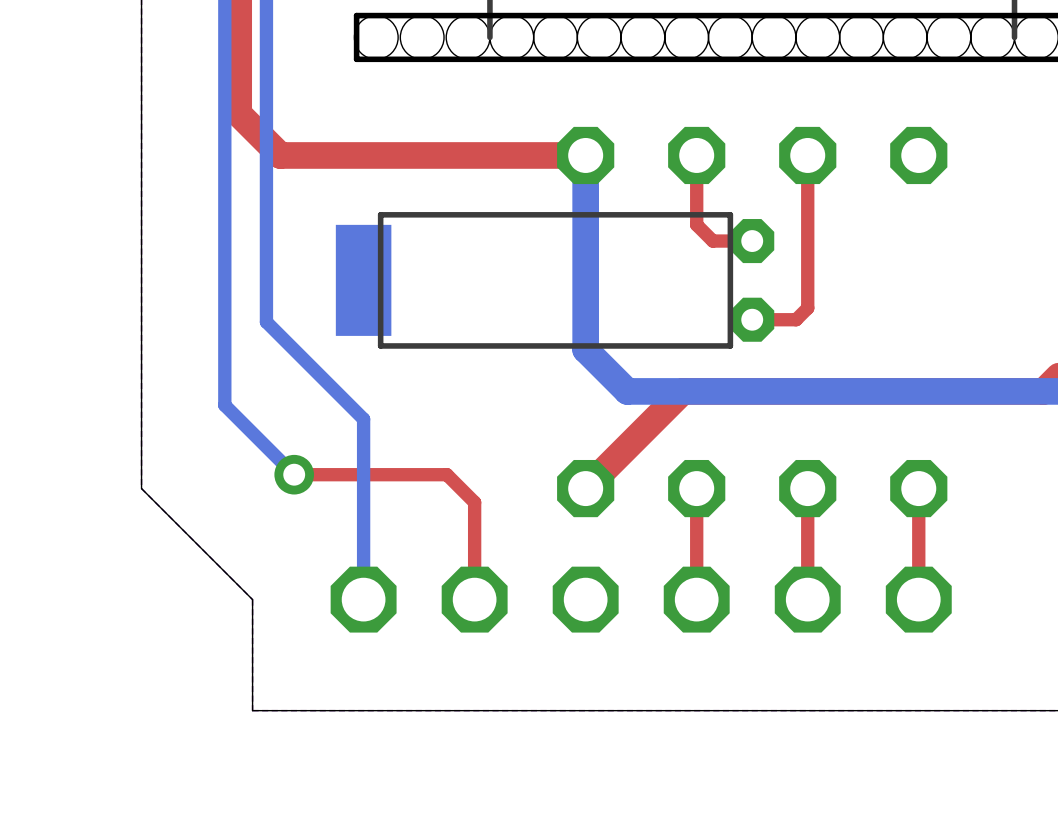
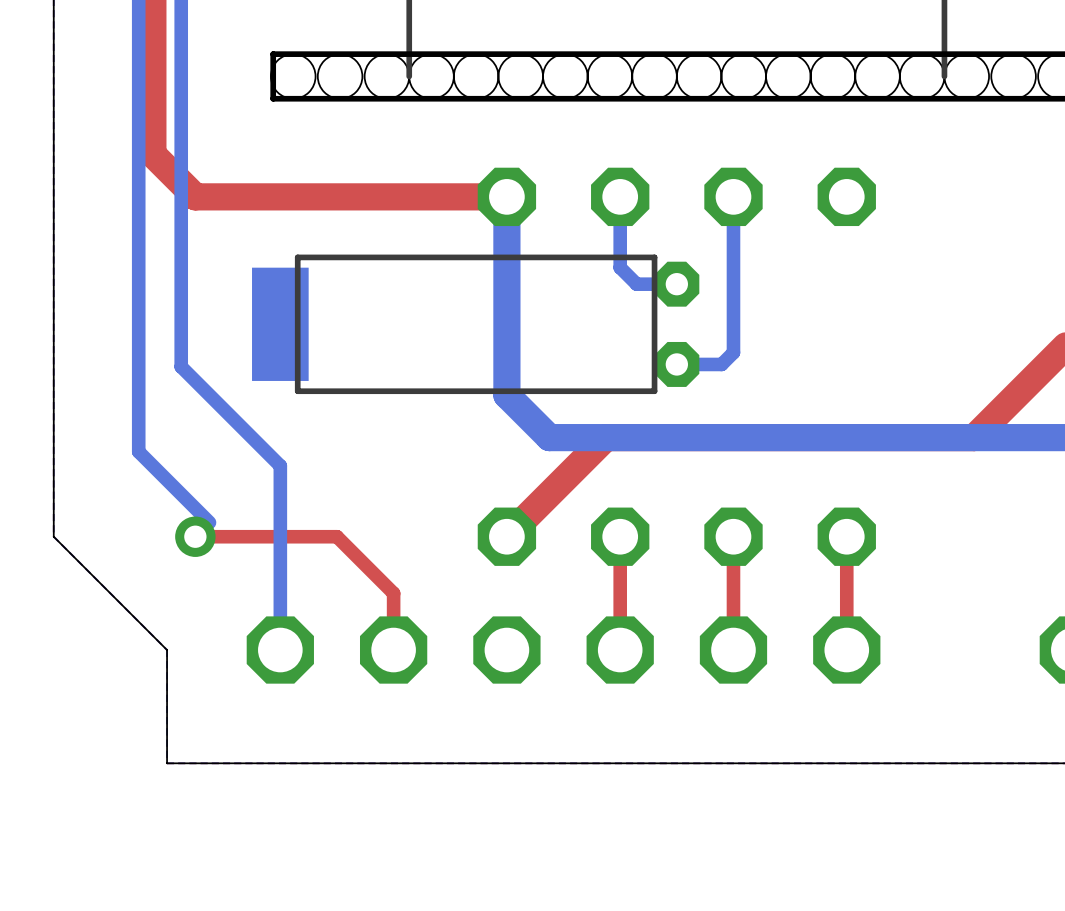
bottom track: none -> (620, 196) (620, 267) (636, 284) (676, 284)
top track: (696, 155) (696, 224) (712, 241) (752, 241) -> none
bottom track: none -> (733, 196) (733, 352) (721, 364) (676, 364)
top track: (807, 155) (807, 308) (796, 319) (752, 319) -> none
top track: (294, 474) (446, 474) (474, 502) (474, 544) -> (195, 536) (336, 536) (393, 593)
via position: (294, 474) -> (195, 536)

